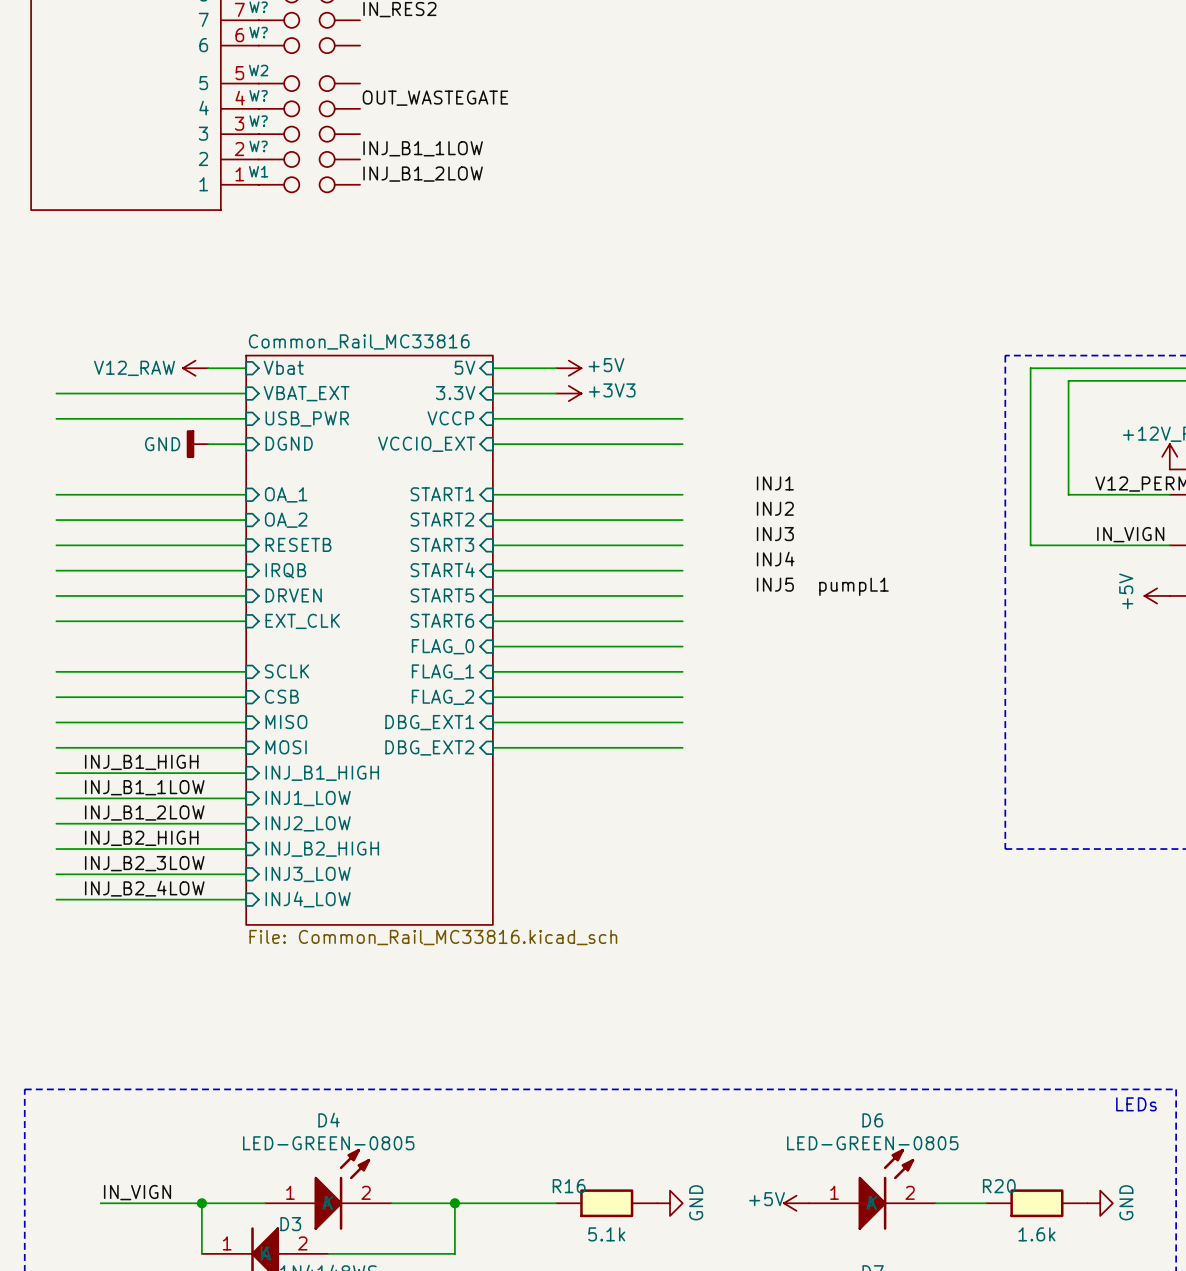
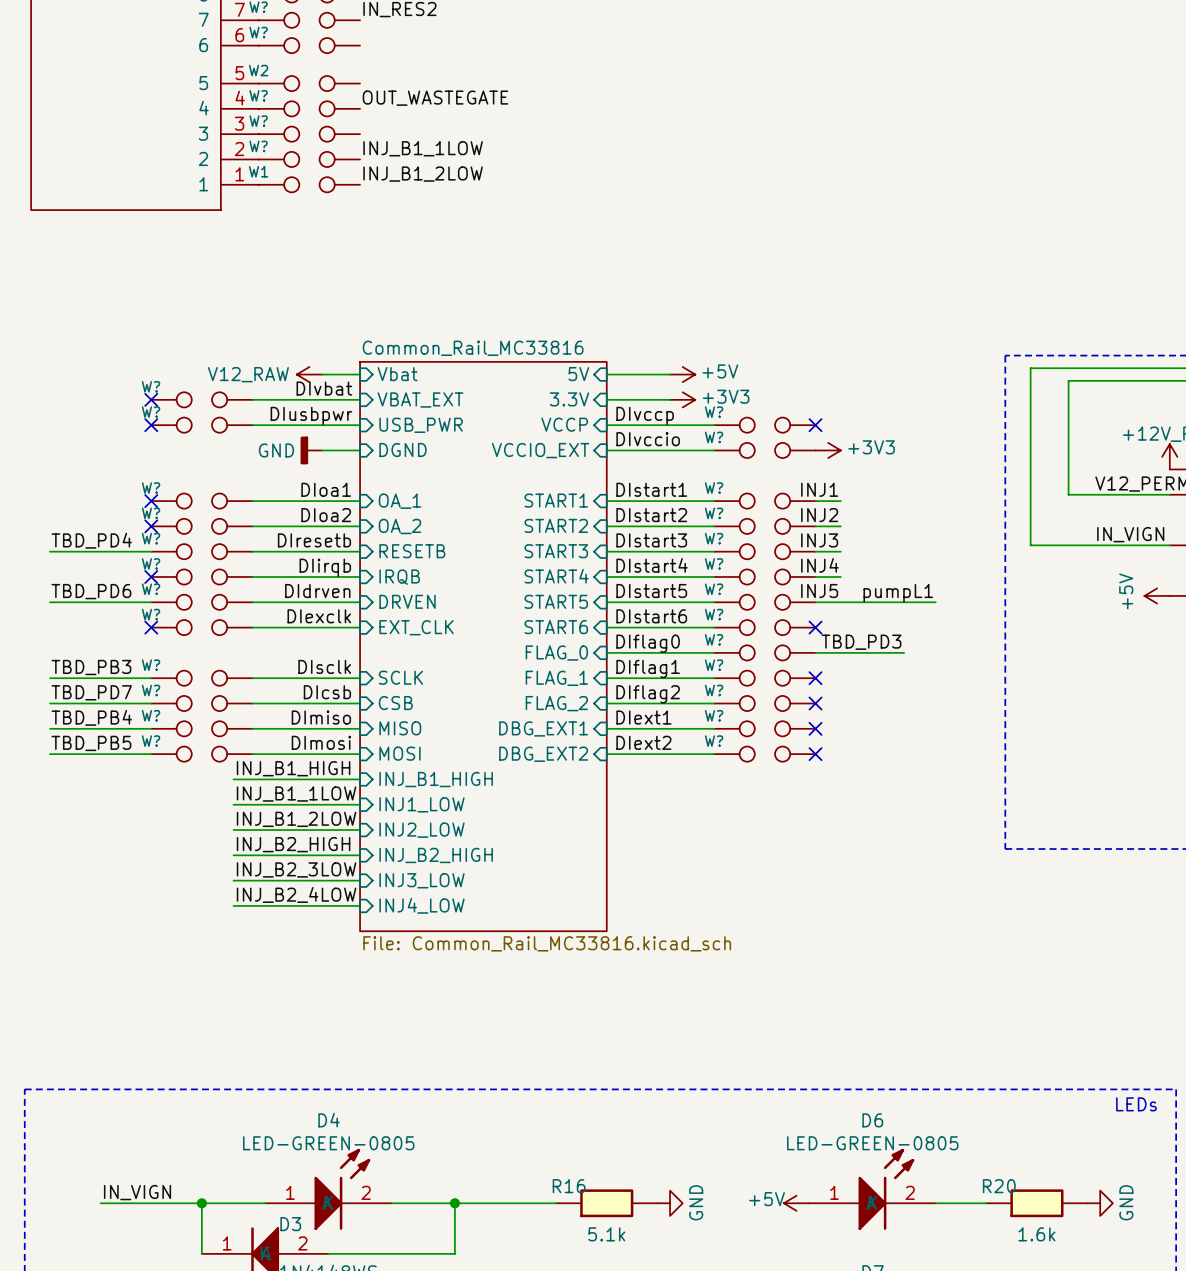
sheet pin position: Vbat (283, 367) -> Vbat (397, 374)
sheet pin position: 5V (464, 367) -> 5V (578, 374)
power symbol position: V12_RAW (195, 368) -> V12_RAW (309, 374)
wire: (208, 368) (246, 368) -> (322, 374) (360, 374)
wire: (492, 368) (556, 368) -> (606, 374) (670, 374)
power symbol position: +5V (568, 368) -> +5V (682, 374)
label: none -> DIvbat (324, 388)
wire: (56, 393) (246, 393) -> none
sheet pin position: VBAT_EXT (306, 393) -> VBAT_EXT (420, 399)
sheet pin position: 3.3V (455, 393) -> 3.3V (569, 399)
wire: (492, 393) (556, 393) -> (606, 399) (670, 399)
power symbol position: +3V3 (568, 393) -> +3V3 (682, 399)
no-connect mark: none -> (151, 399)
W?: none -> (201, 399)
wire: none -> (252, 399) (360, 399)
label: none -> DIusbpwr (311, 415)
label: none -> DIvccp (645, 415)
wire: (56, 418) (246, 418) -> none
sheet pin position: USB_PWR (307, 418) -> USB_PWR (421, 425)
sheet pin position: VCCP (450, 418) -> VCCP (564, 424)
wire: (492, 418) (682, 418) -> none
no-connect mark: none -> (151, 425)
W?: none -> (201, 425)
wire: none -> (252, 425) (360, 425)
wire: none -> (606, 425) (714, 425)
W?: none -> (764, 425)
no-connect mark: none -> (815, 425)
label: none -> DIvccio (648, 439)
sheet pin position: DGND (289, 443) -> DGND (403, 449)
power symbol position: GND (197, 444) -> GND (311, 450)
wire: (208, 444) (246, 444) -> (322, 450) (360, 450)
sheet pin position: VCCIO_EXT (426, 444) -> VCCIO_EXT (540, 450)
wire: (492, 444) (682, 444) -> none
wire: none -> (606, 450) (714, 450)
W?: none -> (764, 450)
power symbol: none -> +3V3 (828, 450)
label position: INJ1 (775, 483) -> INJ1 (819, 489)
label: none -> DIoa1 (326, 489)
label: none -> DIstart1 (651, 489)
wire: (56, 494) (246, 494) -> none
sheet pin position: OA_1 (286, 494) -> OA_1 (400, 501)
sheet pin position: START1 (442, 494) -> START1 (556, 500)
wire: (492, 494) (682, 494) -> none
no-connect mark: none -> (151, 501)
W?: none -> (201, 501)
wire: none -> (252, 501) (360, 501)
wire: none -> (606, 501) (714, 501)
W?: none -> (764, 501)
wire: none -> (815, 501) (840, 501)
label position: INJ2 (775, 508) -> INJ2 (819, 515)
label: none -> DIoa2 (326, 515)
label: none -> DIstart2 (651, 515)
sheet pin position: START2 (442, 519) -> START2 (556, 525)
wire: (56, 520) (246, 520) -> none
sheet pin position: OA_2 (286, 520) -> OA_2 (400, 526)
wire: (492, 520) (682, 520) -> none
no-connect mark: none -> (151, 526)
W?: none -> (201, 526)
wire: none -> (252, 526) (360, 526)
wire: none -> (606, 526) (714, 526)
W?: none -> (764, 526)
wire: none -> (815, 526) (840, 526)
label position: INJ3 (775, 534) -> INJ3 (819, 540)
label: none -> TBD_PD4 (91, 540)
label: none -> DIresetb (314, 540)
label: none -> DIstart3 (651, 540)
sheet pin position: RESETB (298, 544) -> RESETB (412, 551)
sheet pin position: START3 (442, 544) -> START3 (556, 551)
wire: (56, 545) (246, 545) -> none
wire: (492, 545) (682, 545) -> none
wire: none -> (50, 551) (151, 551)
W?: none -> (201, 551)
wire: none -> (252, 551) (360, 551)
wire: none -> (606, 551) (714, 551)
W?: none -> (764, 551)
wire: none -> (815, 551) (840, 551)
label position: INJ4 (775, 559) -> INJ4 (819, 565)
label: none -> DIstart4 (652, 565)
label: none -> DIirqb (325, 567)
sheet pin position: START4 (442, 569) -> START4 (556, 576)
wire: (56, 570) (246, 570) -> none
sheet pin position: IRQB (285, 570) -> IRQB (399, 577)
wire: (492, 570) (682, 570) -> none
no-connect mark: none -> (151, 576)
W?: none -> (201, 576)
wire: none -> (252, 576) (360, 576)
wire: none -> (606, 576) (714, 576)
W?: none -> (764, 576)
wire: none -> (815, 576) (840, 576)
label position: INJ5 (775, 584) -> INJ5 (819, 591)
label position: pumpL1 (853, 586) -> pumpL1 (898, 593)
label: none -> TBD_PD6 (91, 591)
label: none -> DIdrven (317, 591)
label: none -> DIstart5 (651, 591)
wire: (56, 595) (246, 595) -> none
sheet pin position: DRVEN (293, 595) -> DRVEN (407, 601)
sheet pin position: START5 (442, 595) -> START5 (556, 601)
wire: (492, 595) (682, 595) -> none
wire: none -> (50, 602) (151, 602)
W?: none -> (201, 602)
wire: none -> (252, 602) (360, 602)
wire: none -> (606, 602) (714, 602)
W?: none -> (764, 602)
wire: none -> (815, 602) (935, 602)
label: none -> DIexclk (319, 616)
label: none -> DIstart6 (651, 616)
sheet pin position: START6 (442, 620) -> START6 (556, 627)
wire: (56, 621) (246, 621) -> none
sheet pin position: EXT_CLK (302, 621) -> EXT_CLK (416, 627)
wire: (492, 621) (682, 621) -> none
no-connect mark: none -> (151, 627)
W?: none -> (201, 627)
wire: none -> (252, 627) (360, 627)
wire: none -> (606, 627) (714, 627)
W?: none -> (764, 627)
no-connect mark: none -> (815, 627)
sheet Common_Rail_MC33816 position: (369, 640) -> (483, 646)
label: none -> TBD_PD3 (861, 642)
label: none -> DIflag0 (648, 643)
sheet pin position: FLAG_0 (442, 646) -> FLAG_0 (556, 653)
wire: (492, 646) (682, 646) -> none
wire: none -> (606, 652) (714, 652)
W?: none -> (764, 652)
wire: none -> (815, 652) (904, 652)
label: none -> DIsclk (324, 666)
label: none -> TBD_PB3 (91, 667)
label: none -> DIflag1 (648, 669)
wire: (56, 671) (246, 671) -> none
sheet pin position: SCLK (287, 671) -> SCLK (400, 677)
wire: (492, 671) (682, 671) -> none
sheet pin position: FLAG_1 (442, 672) -> FLAG_1 (556, 678)
wire: none -> (50, 678) (151, 678)
W?: none -> (201, 678)
wire: none -> (252, 678) (360, 678)
wire: none -> (606, 678) (714, 678)
W?: none -> (764, 678)
no-connect mark: none -> (815, 678)
label: none -> TBD_PD7 (91, 692)
label: none -> DIcsb (327, 692)
label: none -> DIflag2 (648, 694)
sheet pin position: CSB (281, 696) -> CSB (395, 703)
wire: (56, 697) (246, 697) -> none
sheet pin position: FLAG_2 (442, 697) -> FLAG_2 (556, 703)
wire: (492, 697) (682, 697) -> none
wire: none -> (50, 703) (151, 703)
W?: none -> (201, 703)
wire: none -> (252, 703) (360, 703)
wire: none -> (606, 703) (714, 703)
W?: none -> (764, 703)
no-connect mark: none -> (815, 703)
label: none -> TBD_PB4 (91, 717)
label: none -> DImiso (321, 717)
label: none -> DIext1 (643, 717)
wire: (56, 722) (246, 722) -> none
sheet pin position: MISO (286, 722) -> MISO (400, 728)
sheet pin position: DBG_EXT1 (429, 722) -> DBG_EXT1 (543, 728)
wire: (492, 722) (682, 722) -> none
wire: none -> (50, 728) (151, 728)
W?: none -> (201, 728)
wire: none -> (252, 728) (360, 728)
wire: none -> (606, 728) (714, 728)
W?: none -> (764, 728)
no-connect mark: none -> (815, 728)
label: none -> DImosi (321, 742)
label: none -> DIext2 (643, 742)
label: none -> TBD_PB5 (91, 743)
wire: (56, 747) (246, 747) -> none
sheet pin position: MOSI (286, 747) -> MOSI (400, 753)
sheet pin position: DBG_EXT2 (429, 747) -> DBG_EXT2 (543, 754)
wire: (492, 747) (682, 747) -> none
wire: none -> (50, 754) (151, 754)
W?: none -> (201, 754)
wire: none -> (252, 754) (360, 754)
wire: none -> (606, 754) (714, 754)
W?: none -> (764, 754)
no-connect mark: none -> (815, 754)
label position: INJ_B1_HIGH (141, 762) -> INJ_B1_HIGH (293, 768)
wire: (56, 773) (246, 773) -> none
sheet pin position: INJ_B1_HIGH (322, 773) -> INJ_B1_HIGH (436, 779)
wire: none -> (233, 779) (360, 779)
label position: INJ_B1_1LOW (144, 787) -> INJ_B1_1LOW (296, 794)
wire: (56, 798) (246, 798) -> none
sheet pin position: INJ1_LOW (308, 798) -> INJ1_LOW (422, 804)
wire: none -> (233, 804) (360, 804)
label position: INJ_B1_2LOW (144, 813) -> INJ_B1_2LOW (296, 819)
wire: (56, 823) (246, 823) -> none
sheet pin position: INJ2_LOW (308, 823) -> INJ2_LOW (422, 830)
wire: none -> (233, 830) (360, 830)
label position: INJ_B2_HIGH (141, 838) -> INJ_B2_HIGH (293, 844)
wire: (56, 849) (246, 849) -> none
sheet pin position: INJ_B2_HIGH (322, 849) -> INJ_B2_HIGH (436, 855)
wire: none -> (233, 855) (360, 855)
label position: INJ_B2_3LOW (144, 863) -> INJ_B2_3LOW (296, 869)
wire: (56, 874) (246, 874) -> none
sheet pin position: INJ3_LOW (308, 874) -> INJ3_LOW (422, 880)
wire: none -> (233, 880) (360, 880)
label position: INJ_B2_4LOW (144, 888) -> INJ_B2_4LOW (296, 894)
wire: (56, 899) (246, 899) -> none
sheet pin position: INJ4_LOW (308, 899) -> INJ4_LOW (422, 905)
wire: none -> (233, 905) (360, 905)

